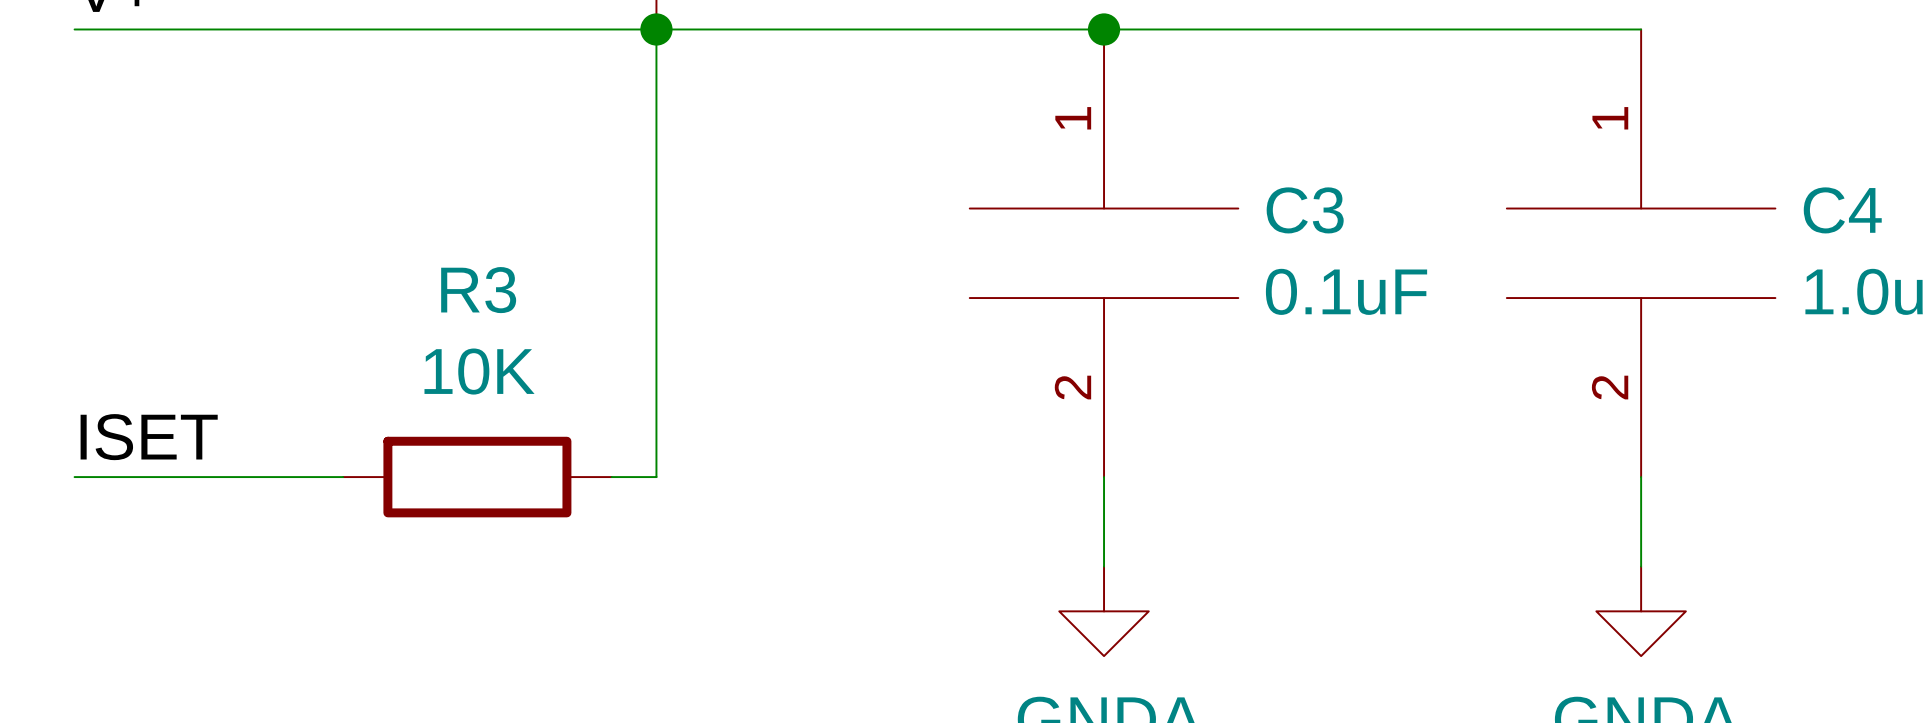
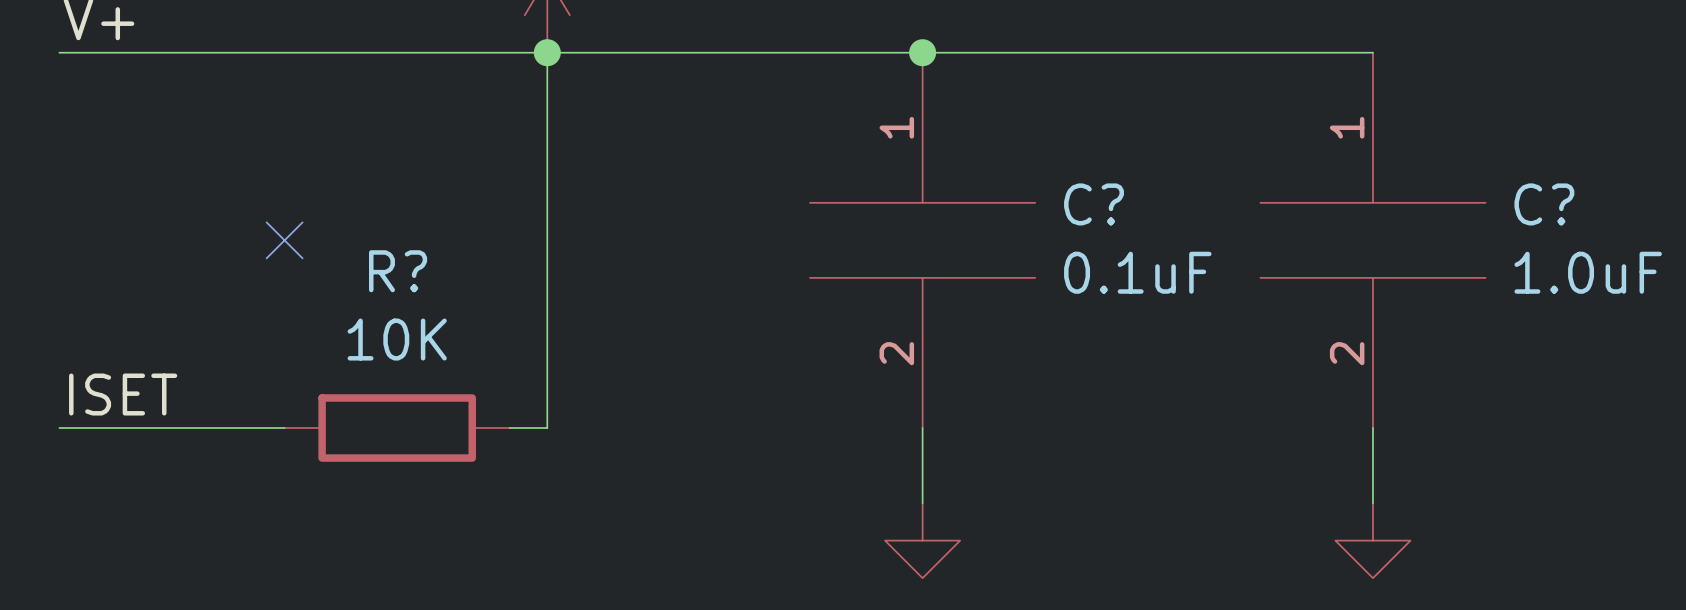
C3 name: C3 (1305, 210) -> C? (1094, 204)
C4 name: C4 (1842, 210) -> C? (1544, 204)
no-connect mark: none -> (284, 240)
R3 name: R3 (478, 290) -> R? (398, 271)

